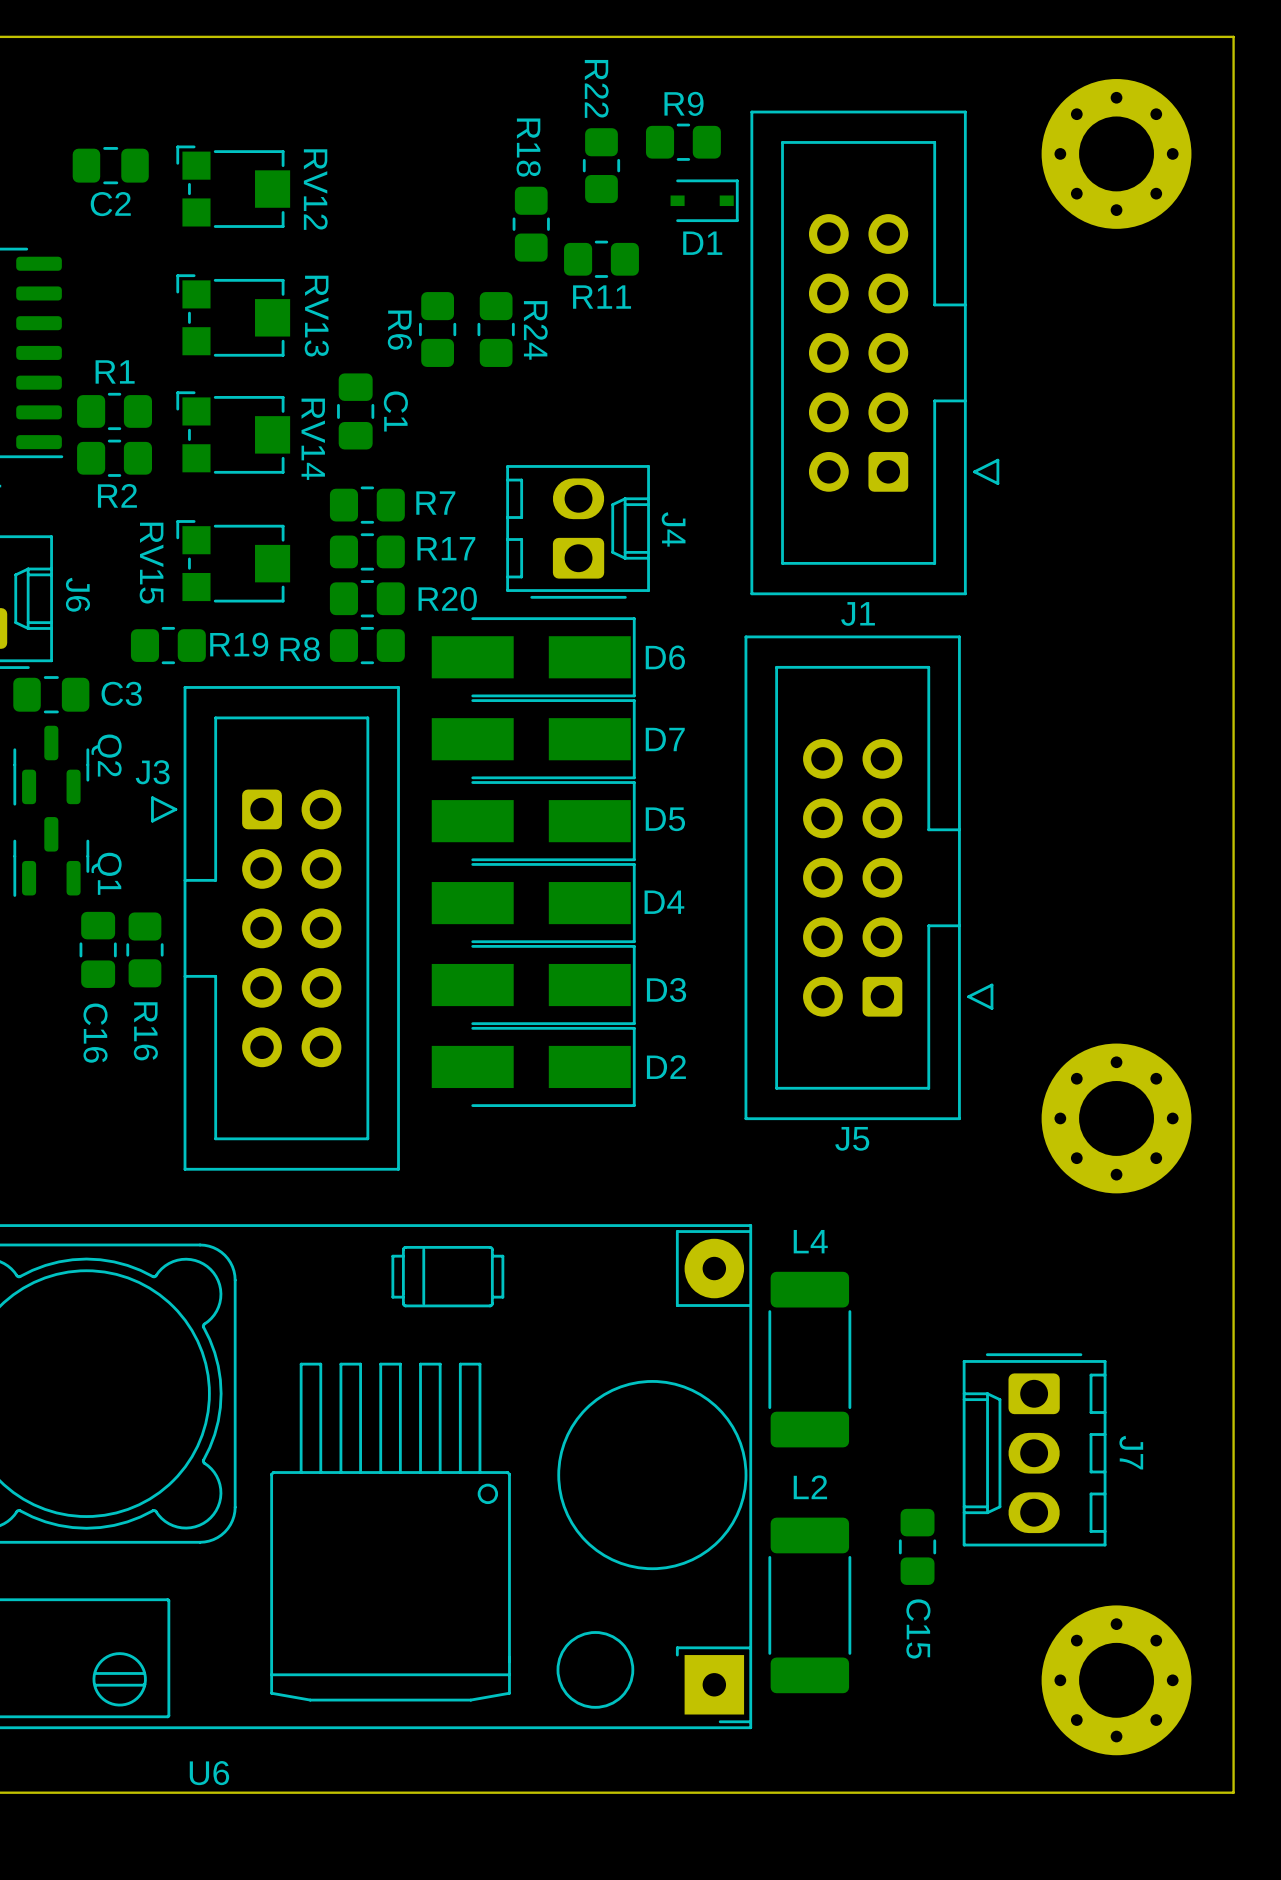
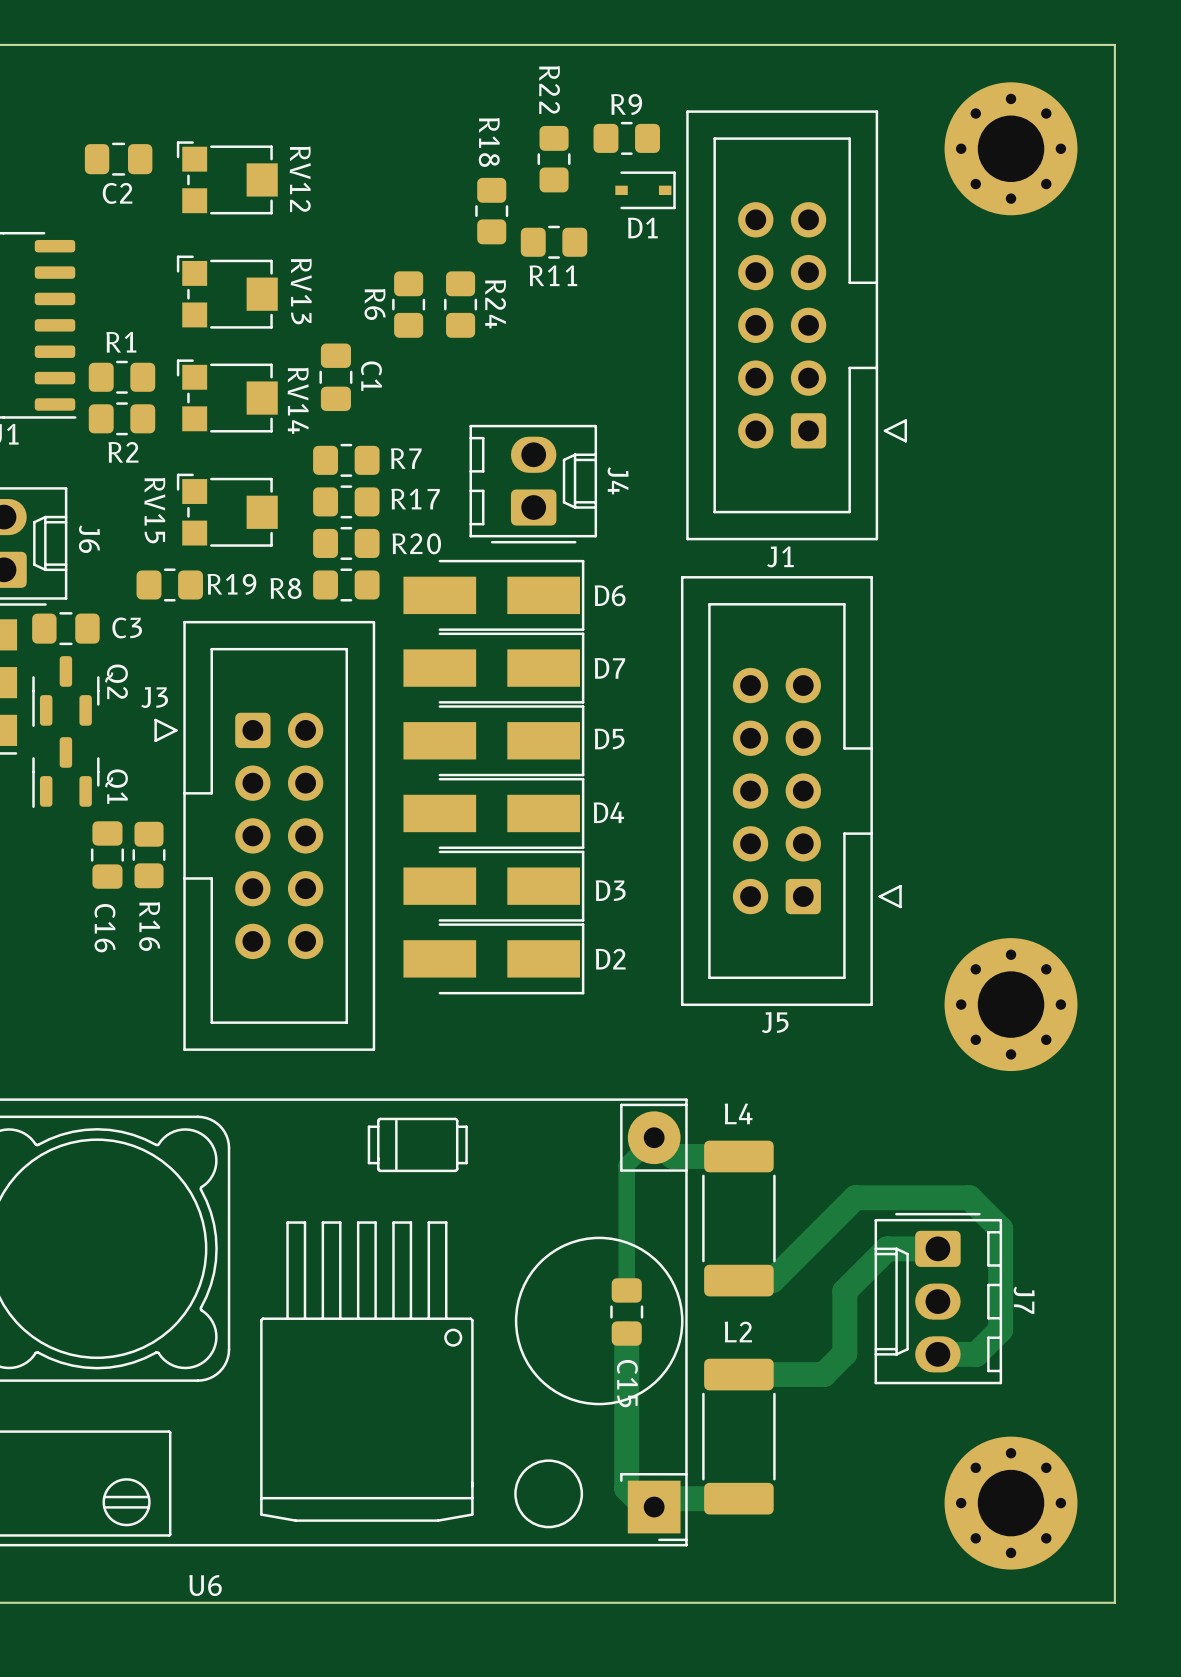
track: none -> (738, 1156) (672, 1156) (654, 1137) (626, 1165) (626, 1290)
track: none -> (937, 1248) (887, 1248) (844, 1291) (844, 1353) (823, 1374) (738, 1374)
track: none -> (738, 1280) (772, 1280) (855, 1197) (969, 1197) (1000, 1228) (1000, 1329) (976, 1354) (937, 1354)
track: none -> (626, 1333) (626, 1488) (645, 1507) (654, 1507) (662, 1498) (738, 1498)
C15 position: (917, 1546) -> (626, 1312)

